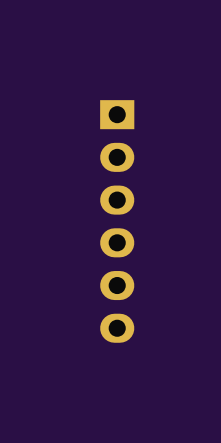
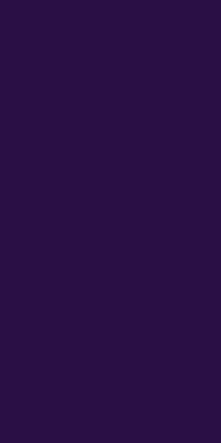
part: (117, 221) -> none

